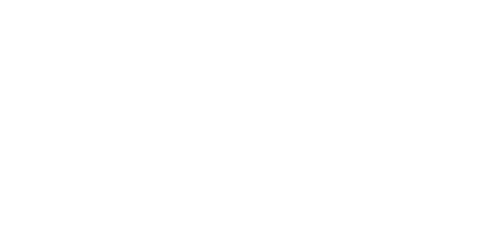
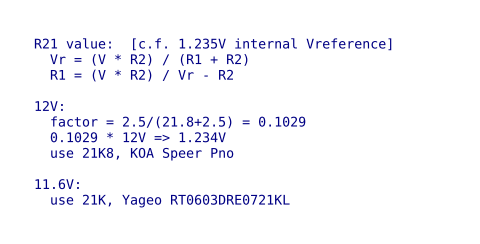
text: none -> R21 value: [c.f. 1.235V internal Vreference] (213, 44)
text: none -> Vr = (V * R2) / (R1 + R2) (148, 59)
text: none -> R1 = (V * R2) / Vr - R2 (141, 75)
text: none -> 12V: (49, 105)
text: none -> factor = 2.5/(21.8+2.5) = 0.1029 (178, 122)
text: none -> 0.1029 * 12V => 1.234V (138, 137)
text: none -> use 21K8, KOA Speer Pno (142, 154)
text: none -> 11.6V: (57, 184)
text: none -> use 21K, Yageo RT0603DRE0721KL (170, 201)

